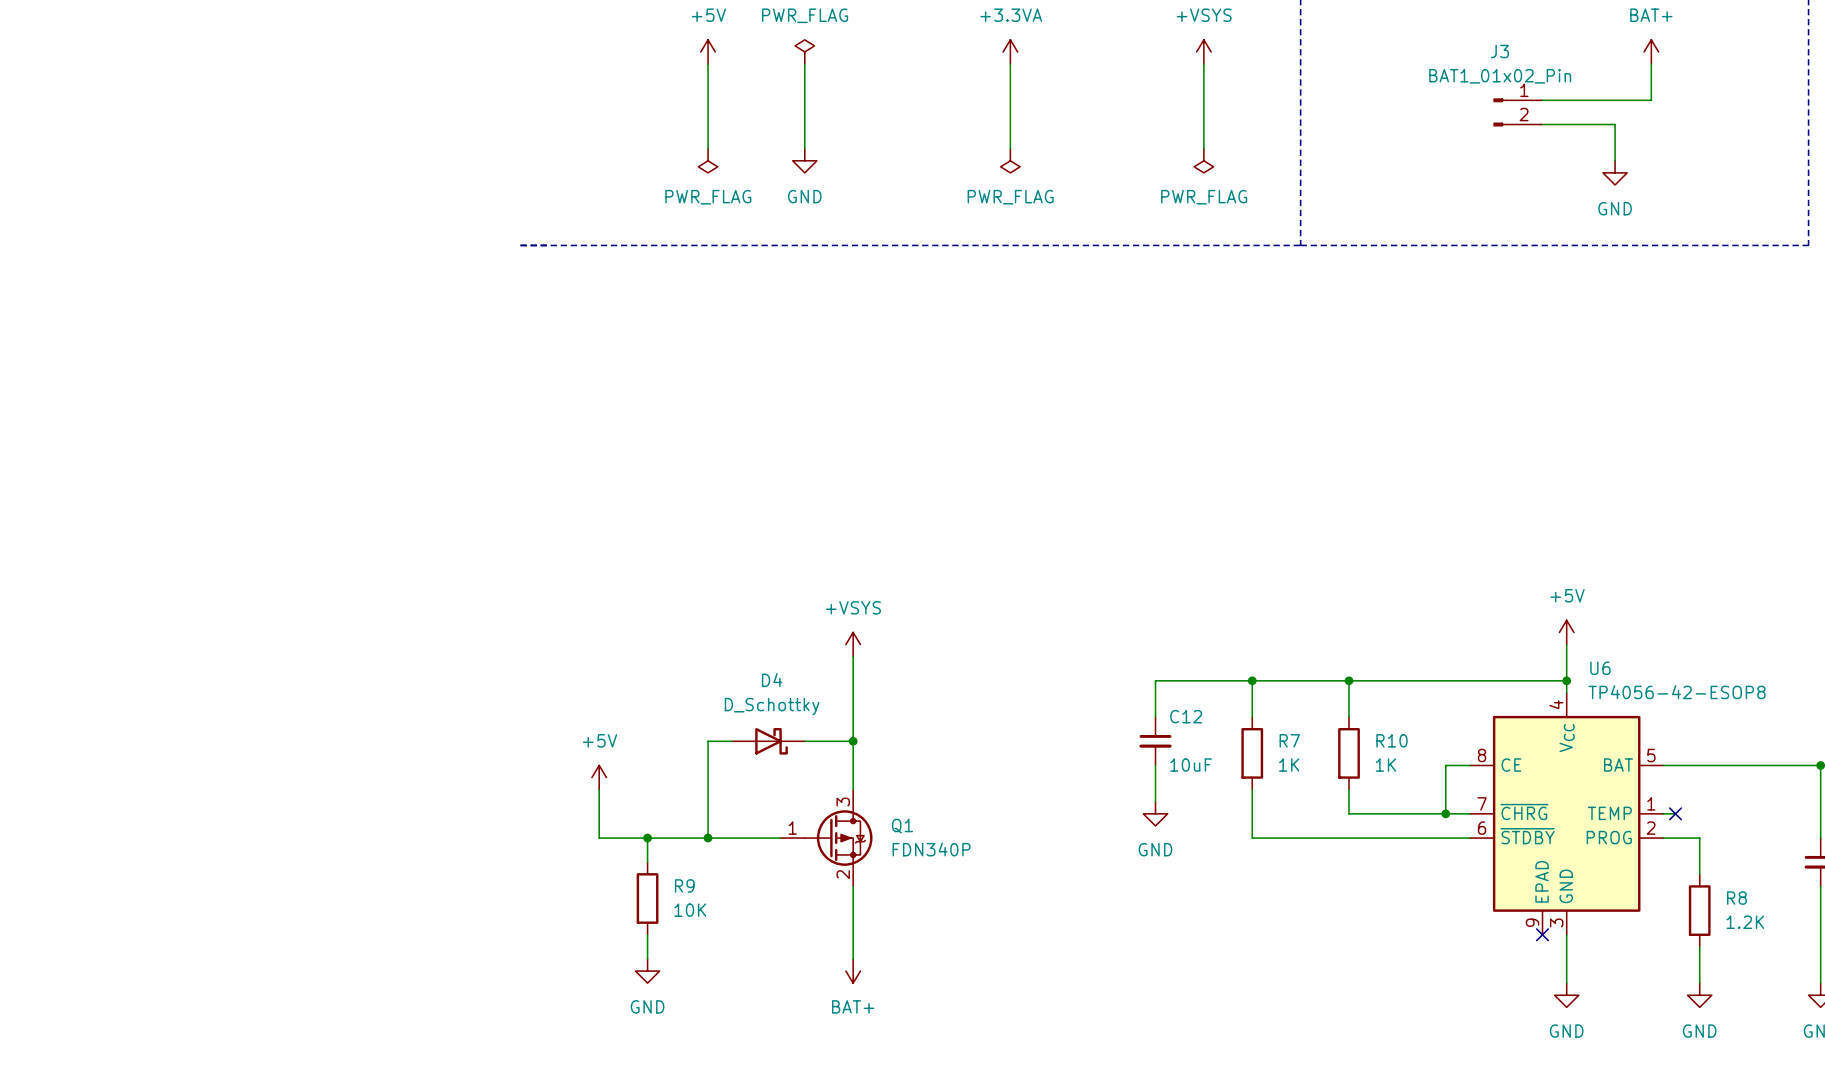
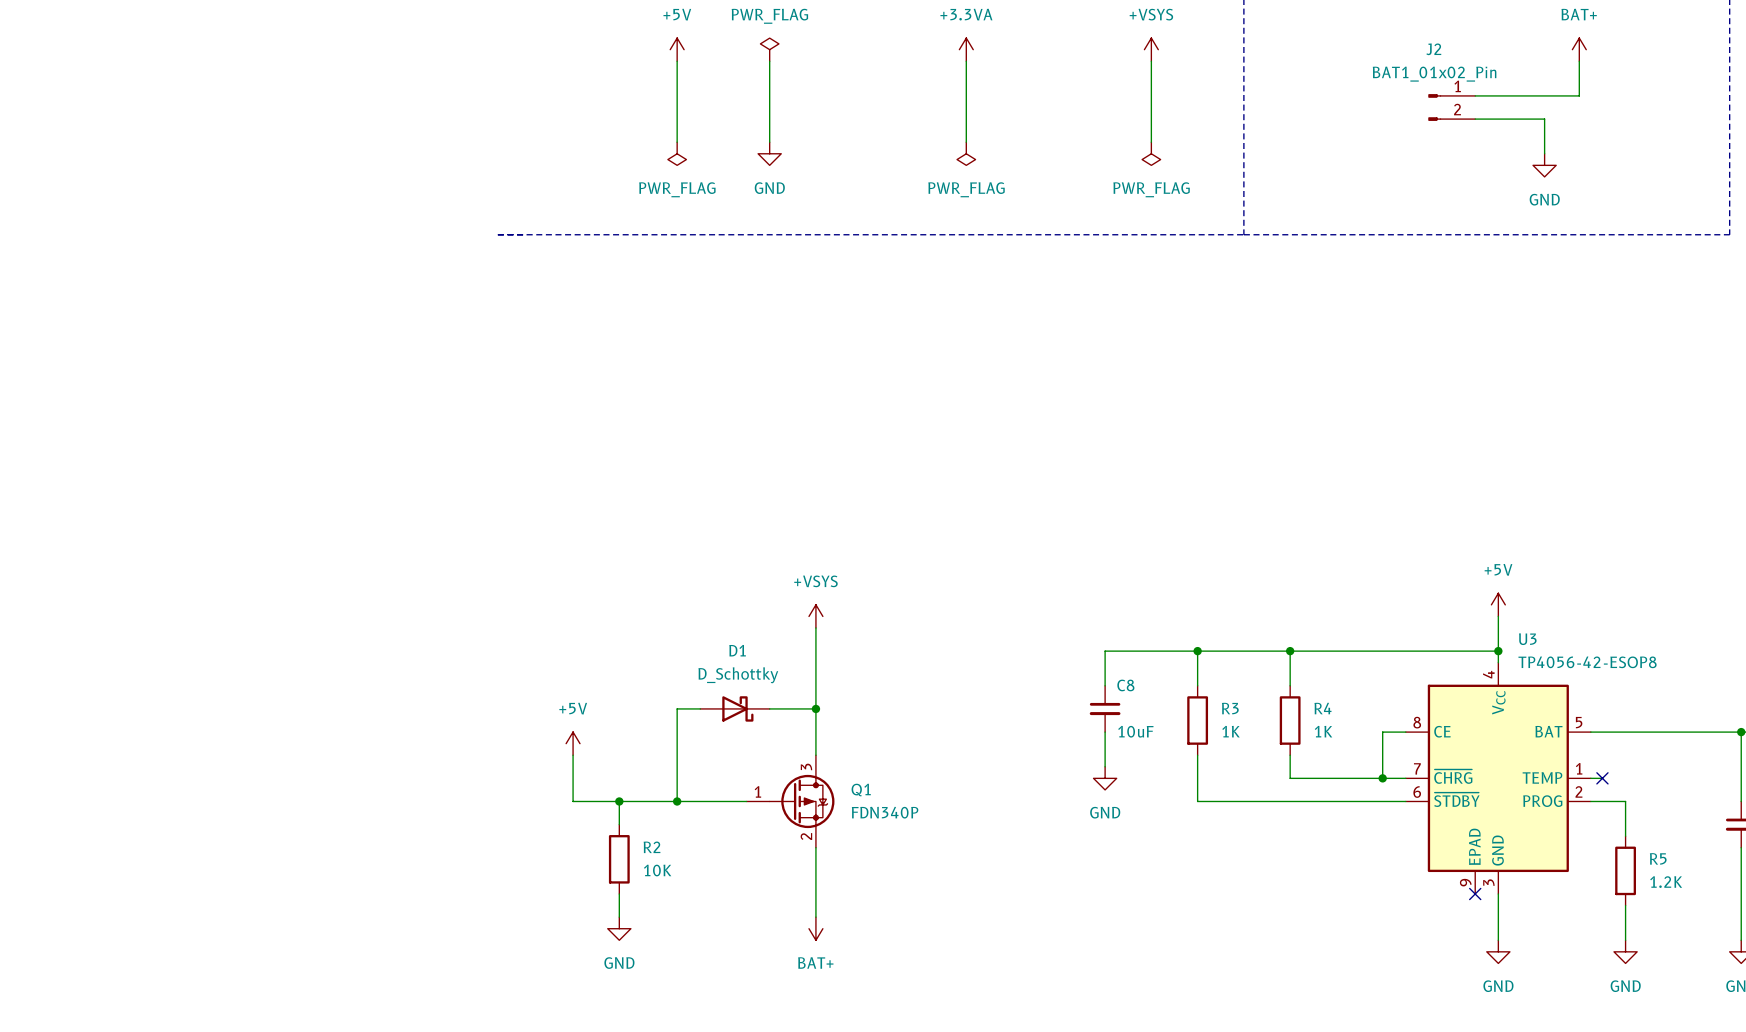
J3 name: J3 (1499, 51) -> J2 (1433, 49)
U6 name: U6 (1600, 668) -> U3 (1527, 639)
D4 name: D4 (772, 680) -> D1 (737, 650)
C12 name: C12 (1186, 716) -> C8 (1125, 685)
R7 name: R7 (1289, 740) -> R3 (1230, 708)
R10 name: R10 (1392, 740) -> R4 (1323, 708)
R9 name: R9 (684, 885) -> R2 (652, 847)
R8 name: R8 (1736, 898) -> R5 (1658, 858)

